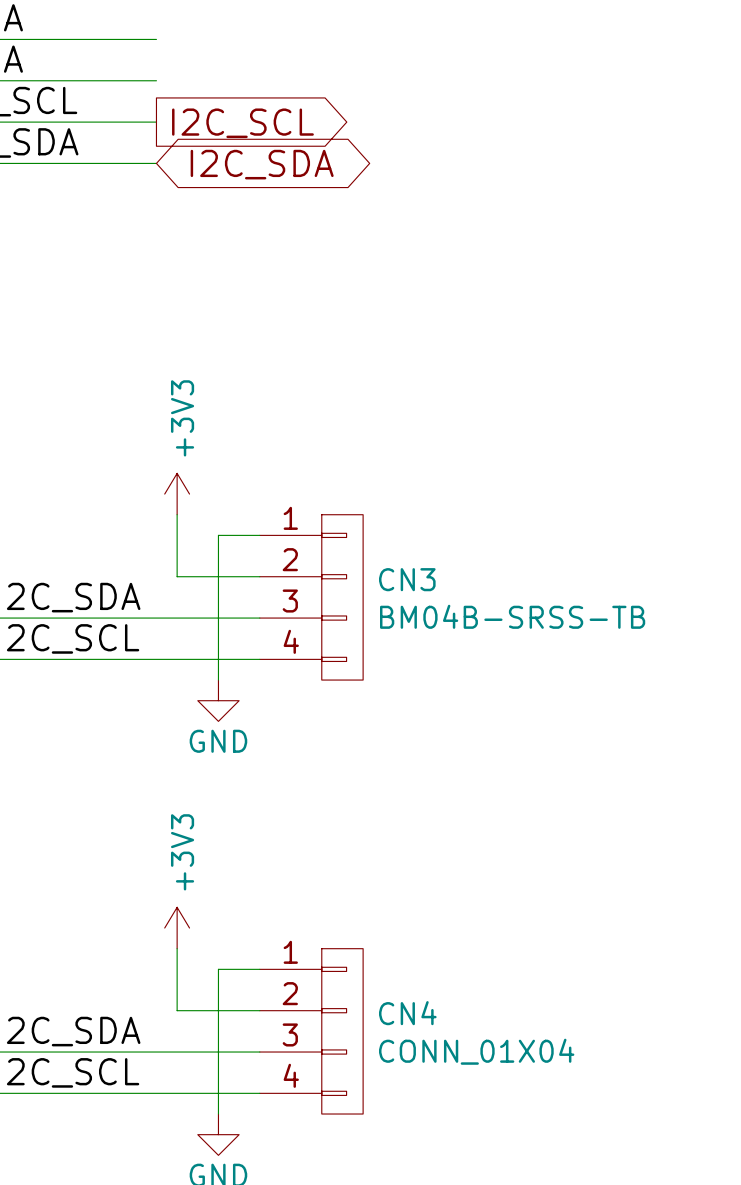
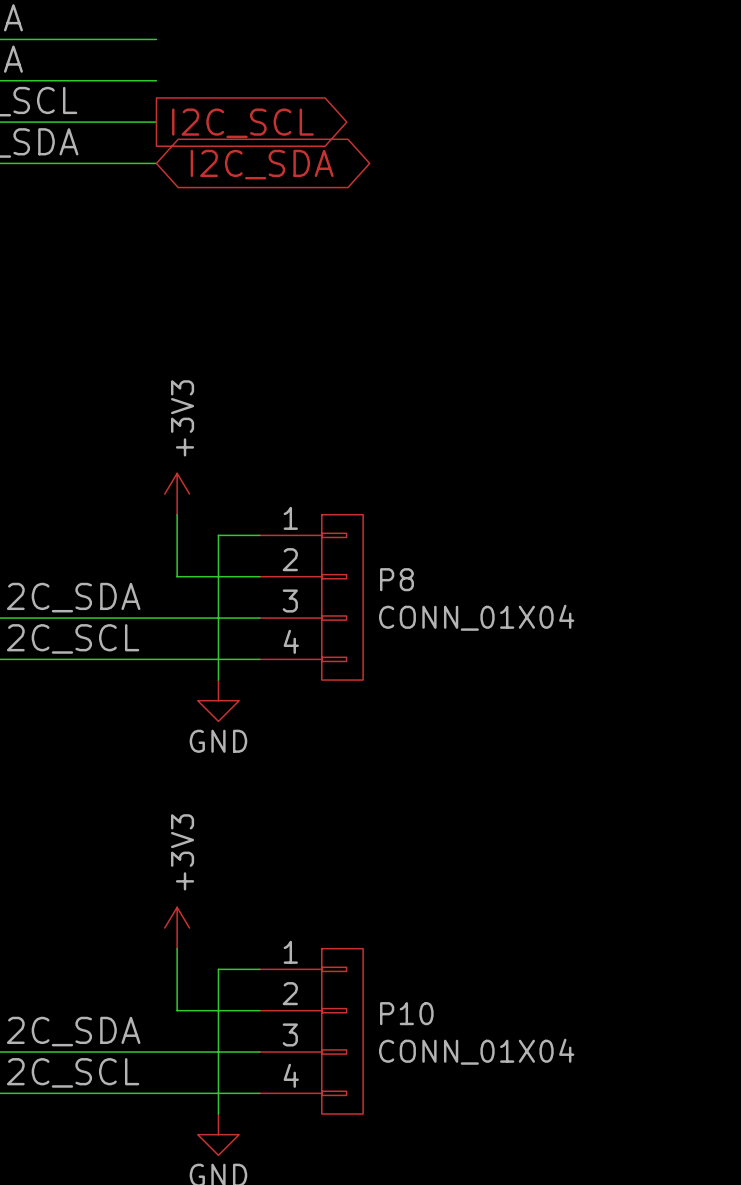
CN3 name: CN3 (407, 579) -> P8 (396, 579)
CN3 value: BM04B-SRSS-TB (512, 616) -> CONN_01X04 (476, 617)
CN4 name: CN4 (407, 1013) -> P10 (406, 1013)

